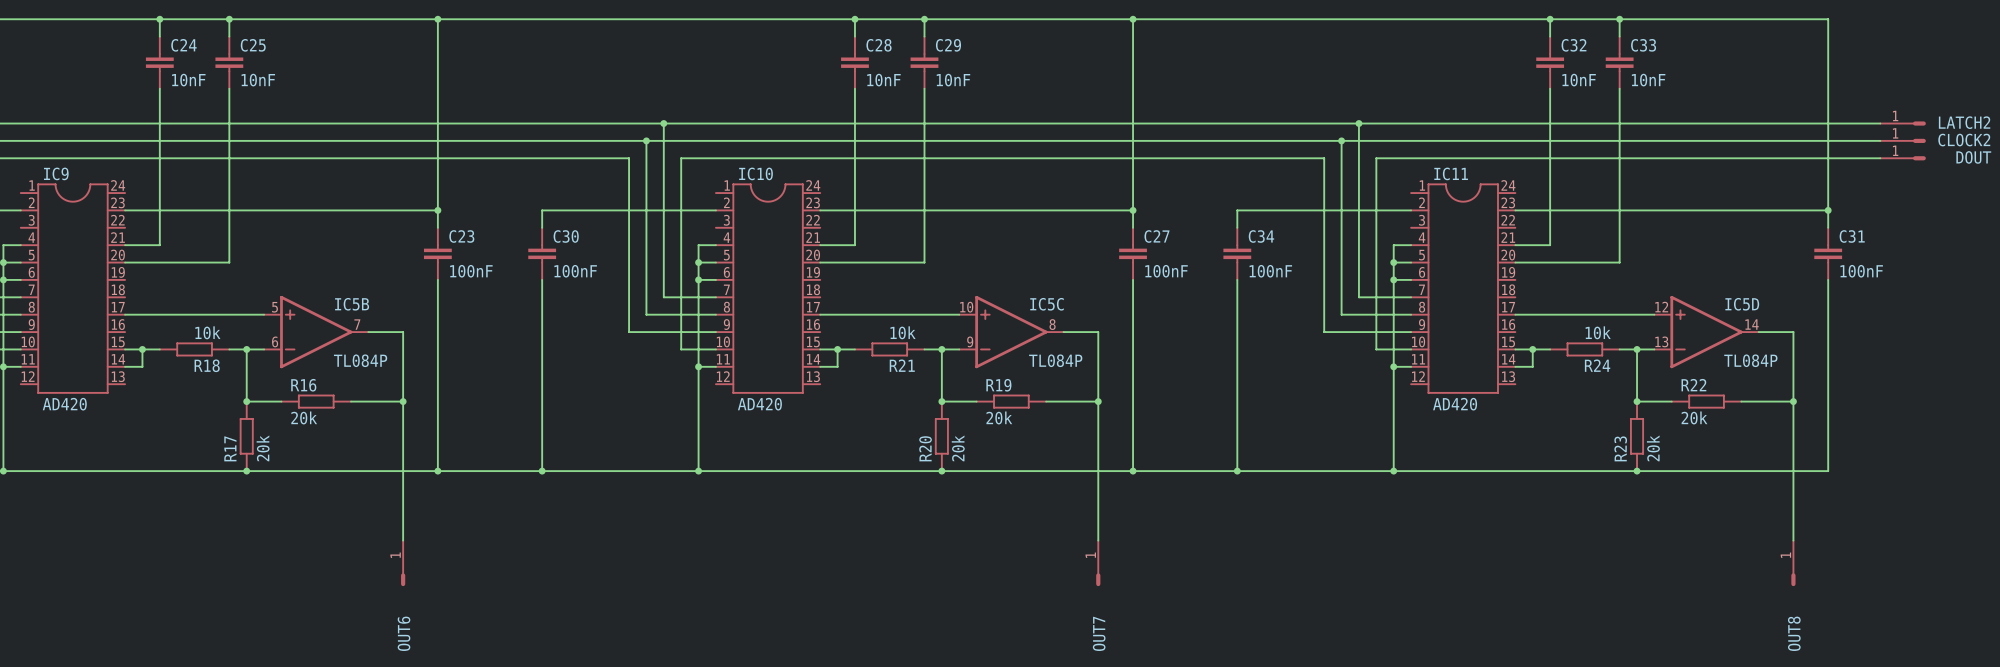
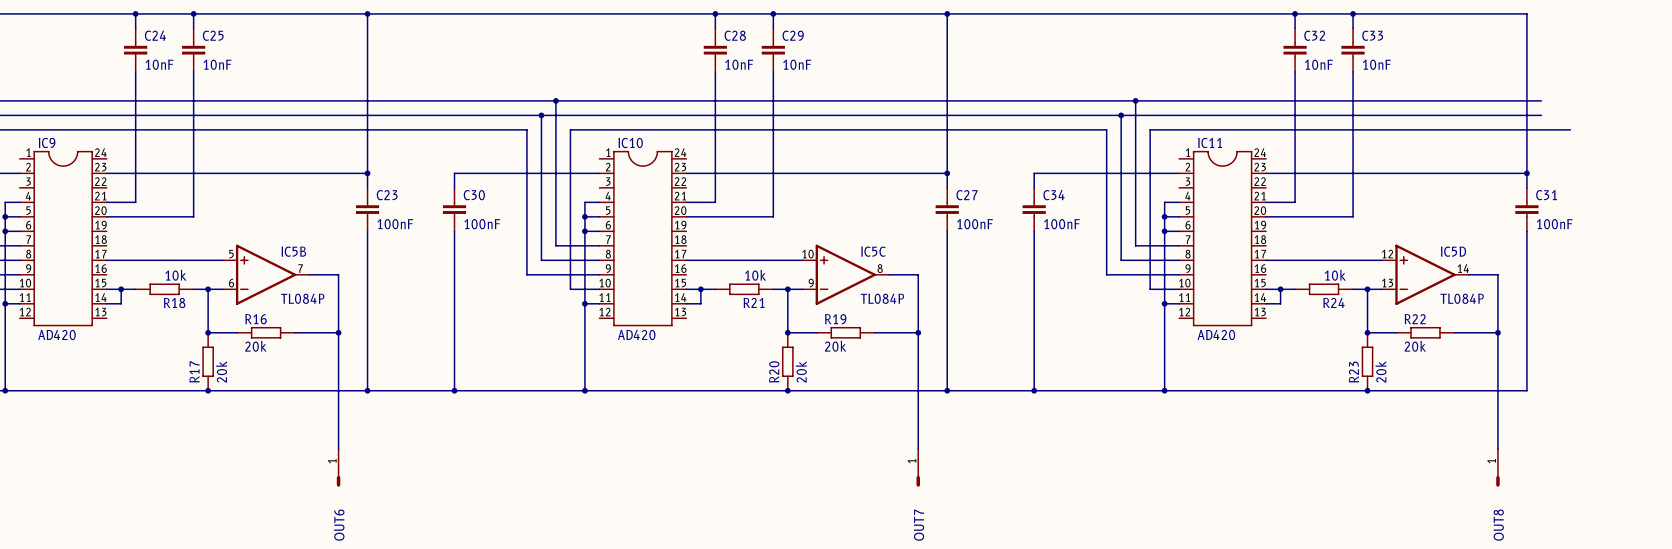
wire: (1845, 123) (1880, 123) -> none
LATCH2: (1903, 123) -> none
wire: (1845, 140) (1880, 140) -> none
CLOCK2: (1903, 140) -> none
DOUT: (1903, 158) -> none

